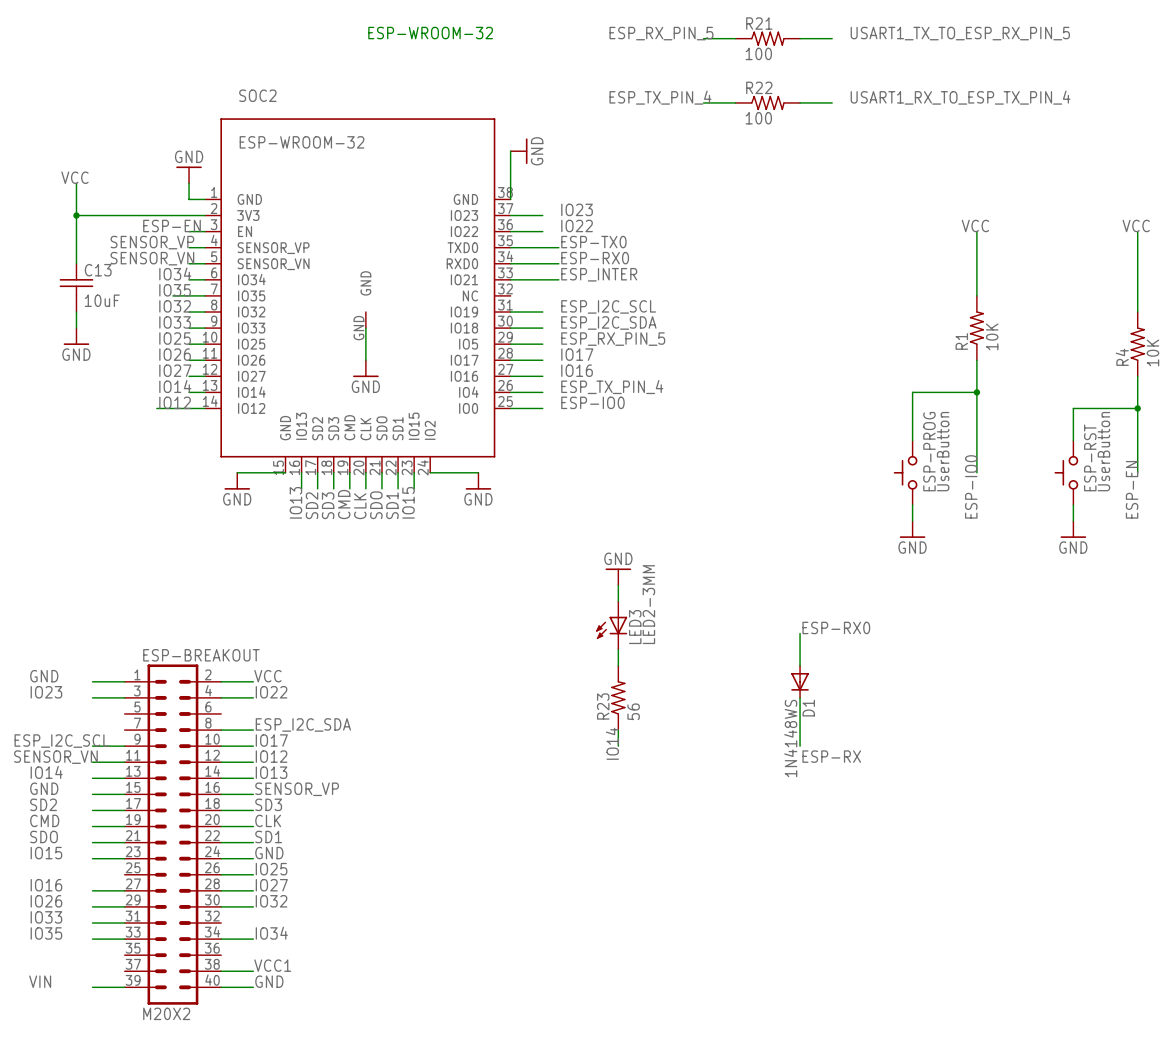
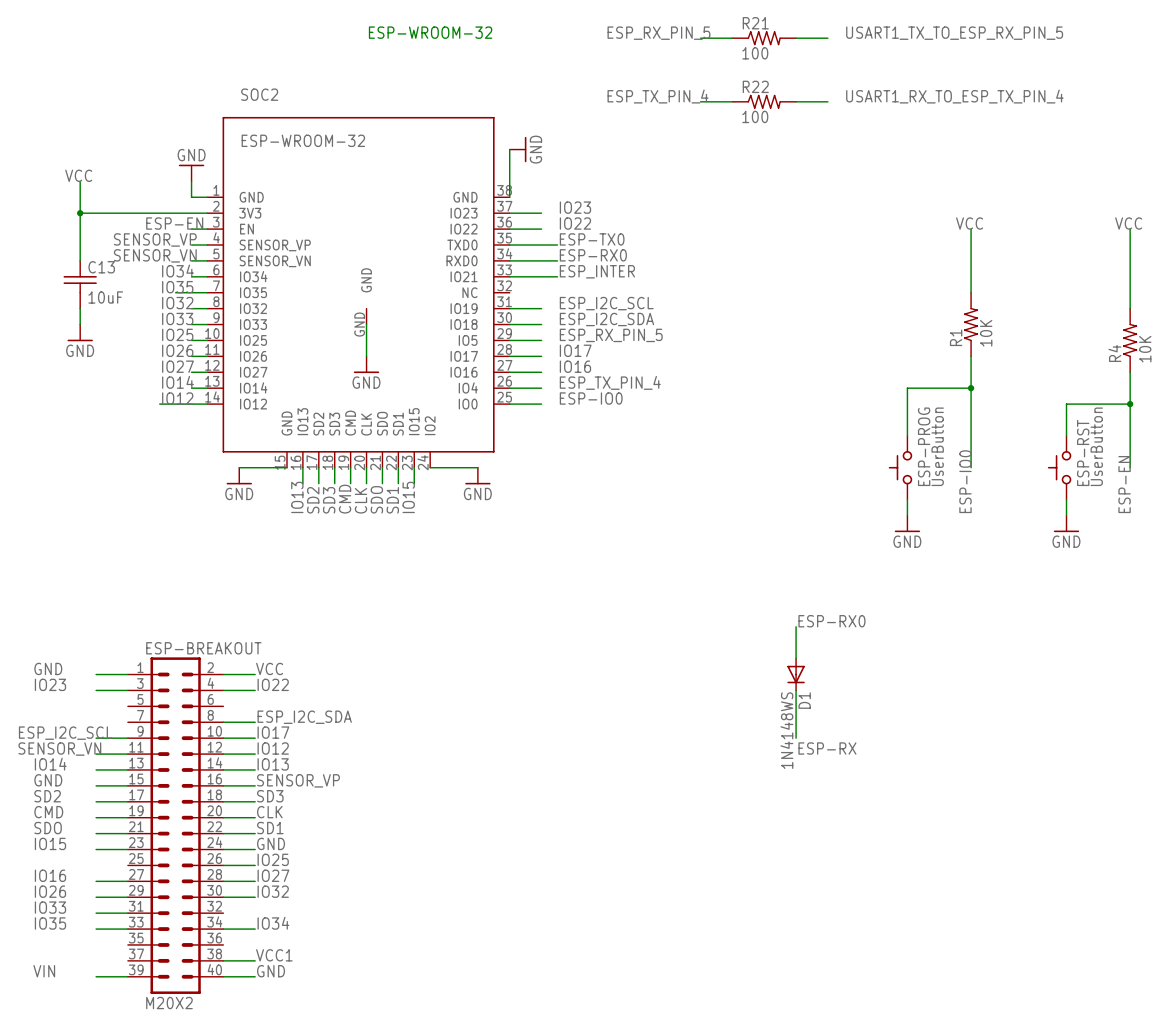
power symbol: GND (618, 576) -> none
wire: (618, 585) (618, 601) -> none
LED3: LED2-3MM (611, 625) -> none
wire: (618, 649) (618, 665) -> none
R23: 56 (618, 697) -> none
wire: (618, 730) (618, 746) -> none
label: IO14 (612, 743) -> none

